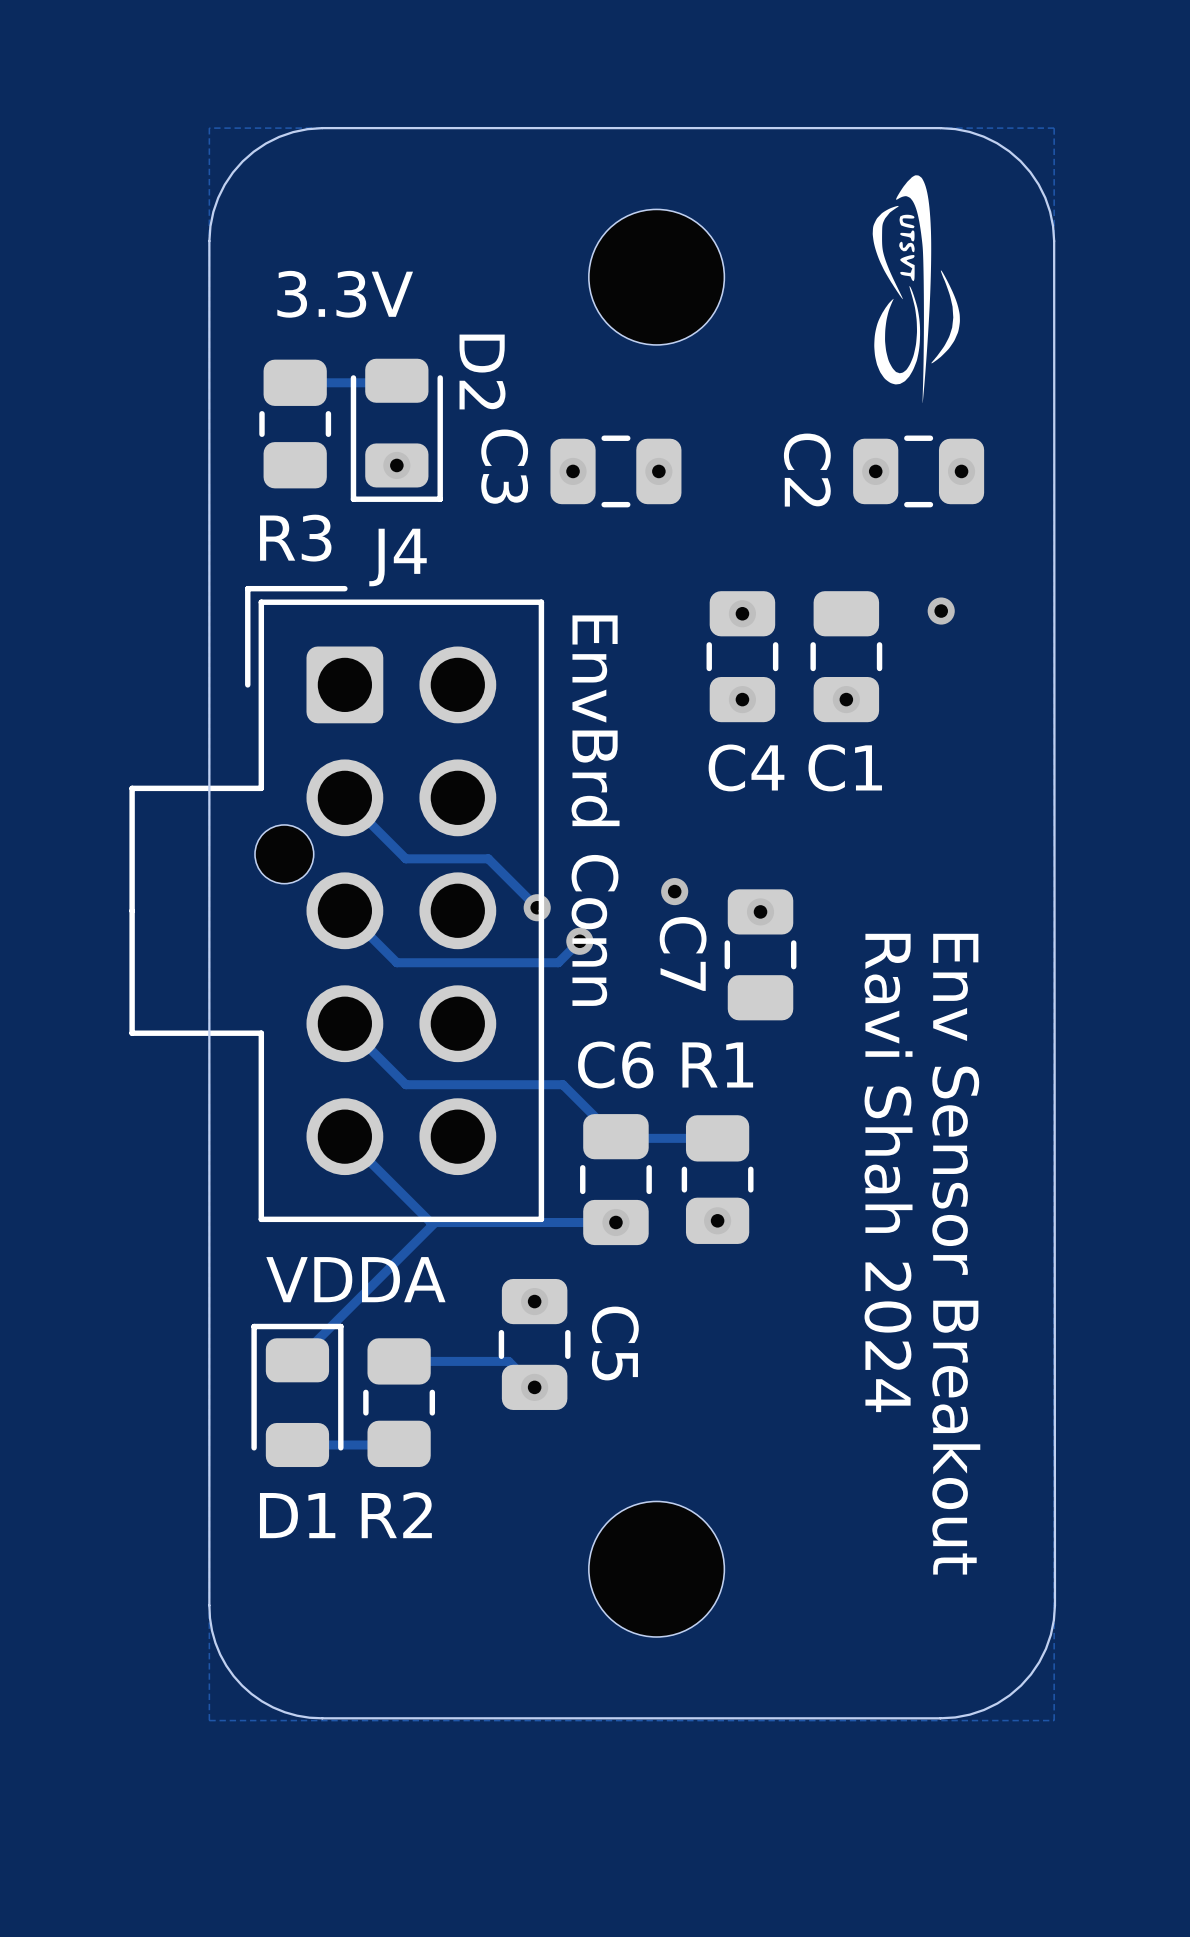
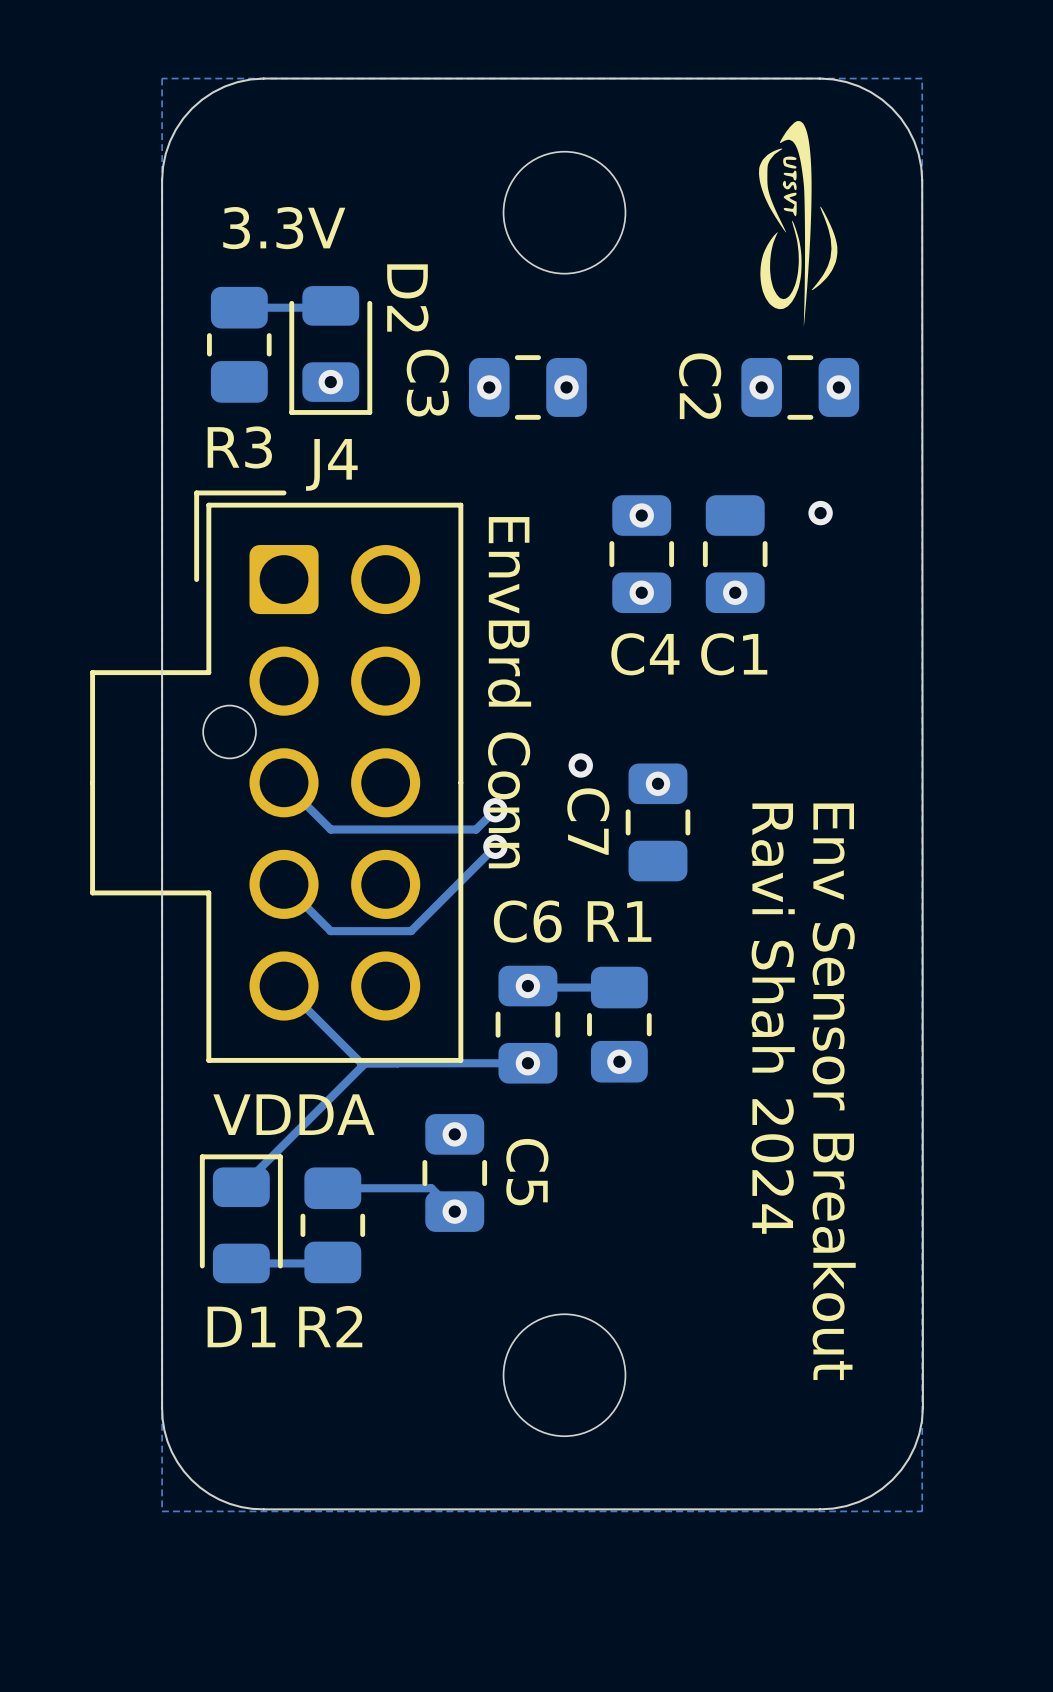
track: (344, 797) (405, 858) (488, 858) (537, 907) -> none
via position: (537, 907) -> (495, 846)
track: (396, 1075) (405, 1084) (562, 1084) (615, 1136) -> (330, 931) (411, 931) (495, 846)
via: none -> (527, 986)

